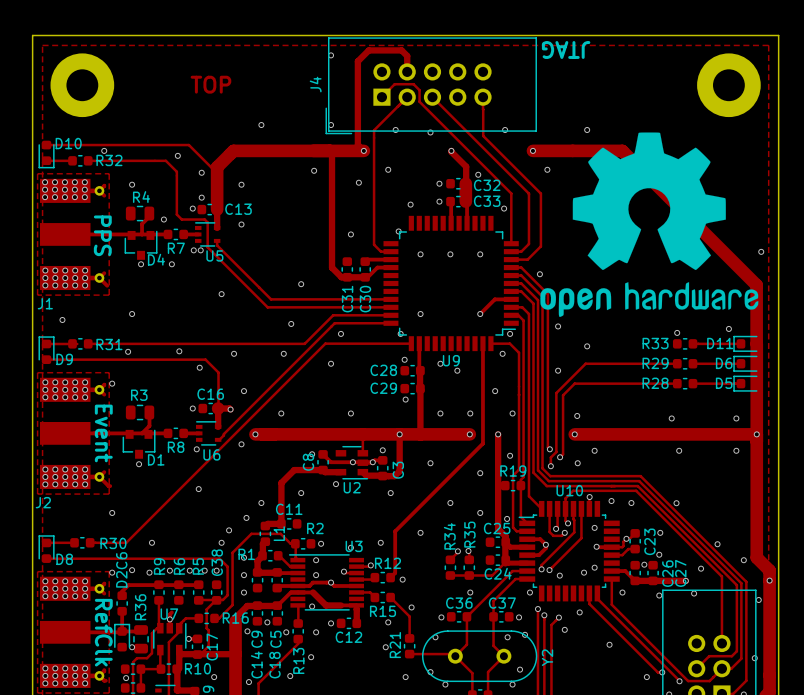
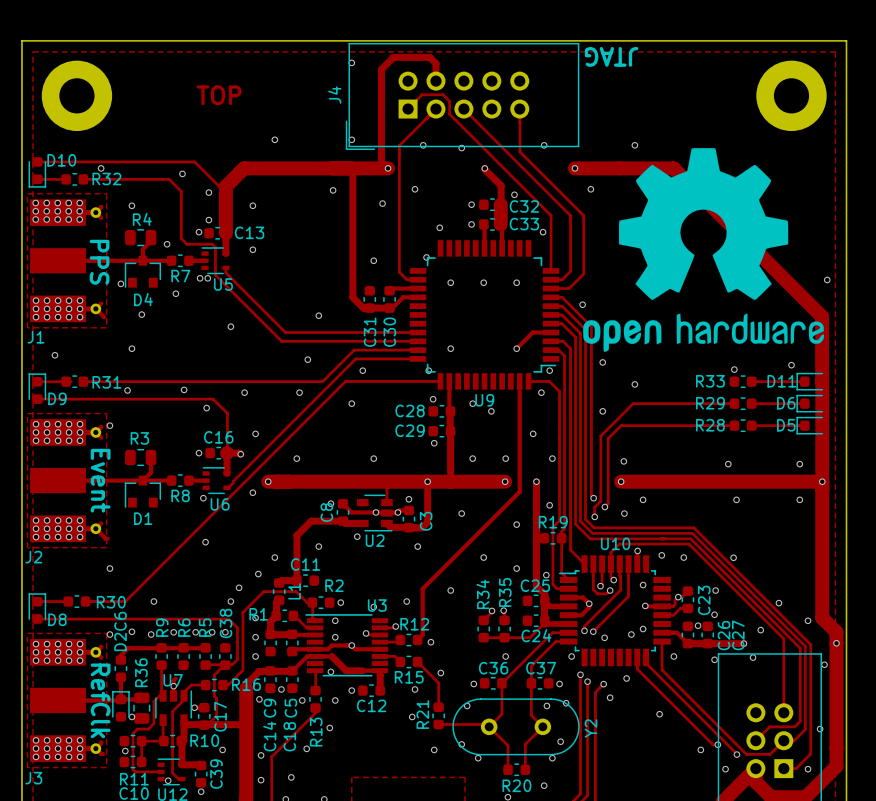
D4 rotation: 0° (141, 245) -> 180° (142, 271)
via: none -> (120, 283)
via: (141, 264) -> none
via: none -> (141, 314)
D1 rotation: 0° (139, 444) -> 180° (142, 491)
via: (139, 464) -> none

